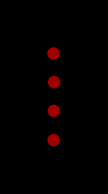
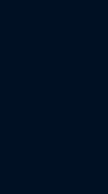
part: (53, 53) -> none
part: (54, 82) -> none
part: (53, 110) -> none
part: (53, 140) -> none

